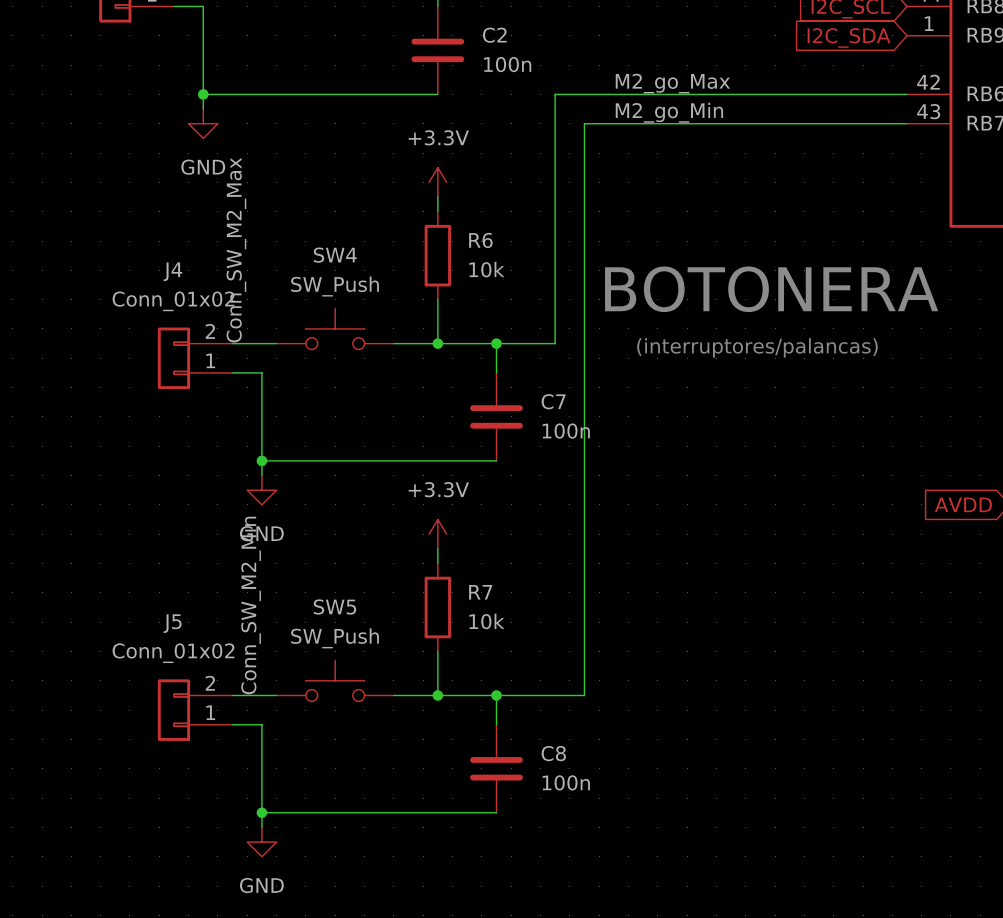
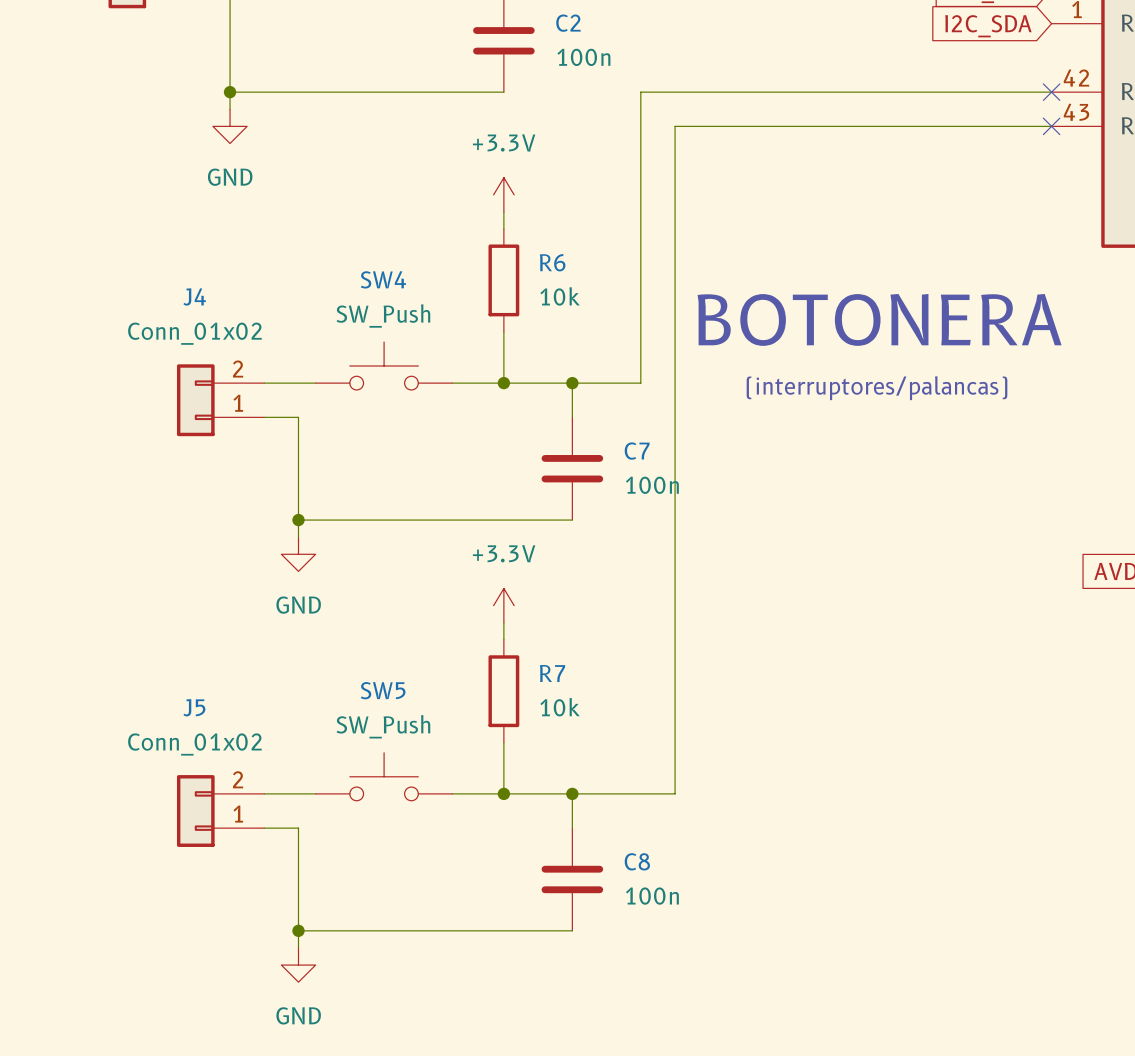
label: M2_go_Max (672, 83) -> none
no-connect mark: none -> (1051, 92)
label: M2_go_Min (669, 112) -> none
no-connect mark: none -> (1051, 126)
label: Conn_SW_M2_Max (236, 250) -> none
label: Conn_SW_M2_Min (250, 605) -> none

